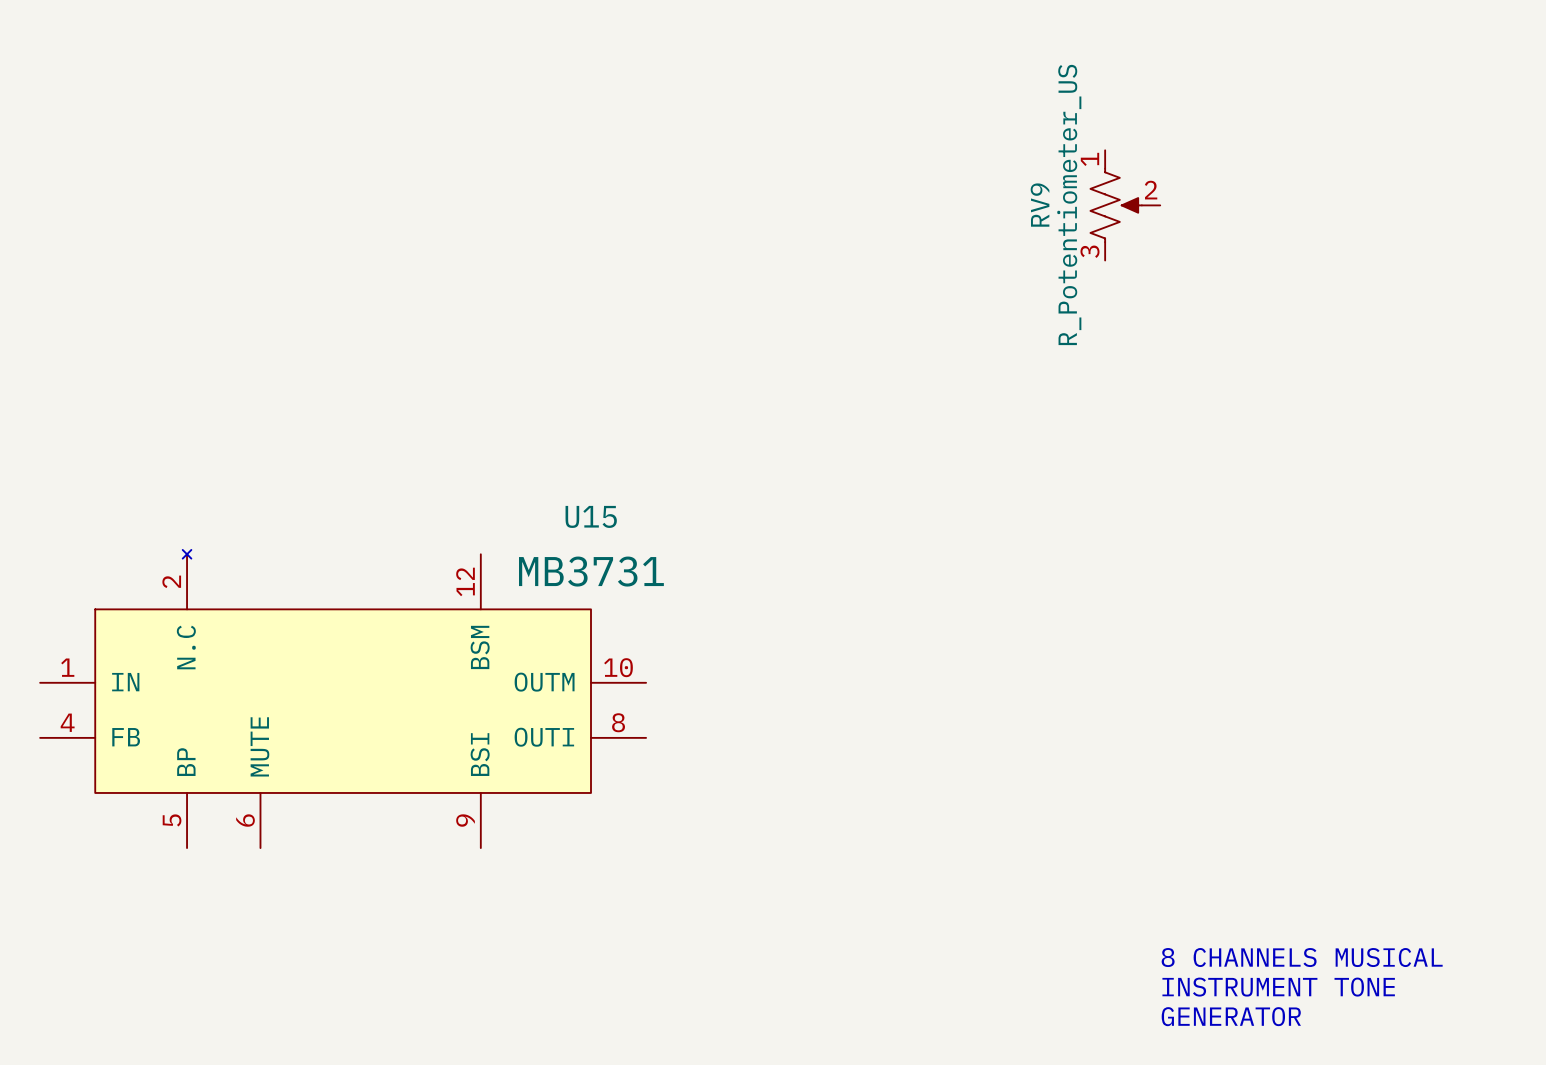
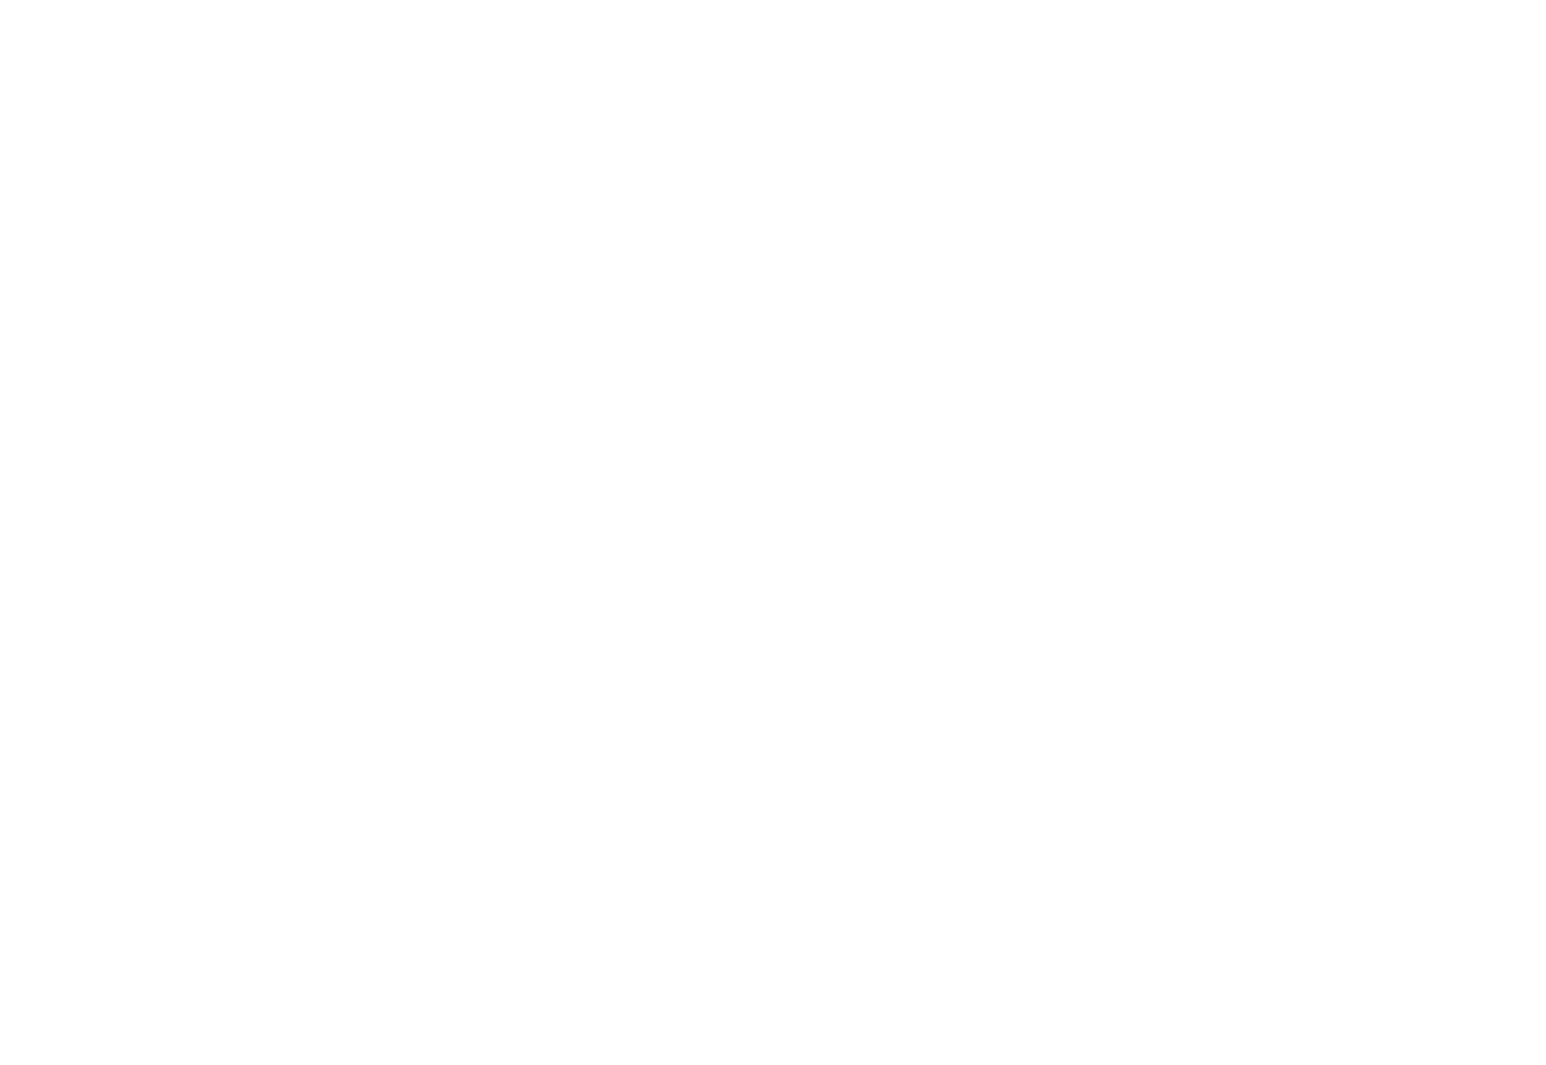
RV9: R_Potentiometer_US (1125, 205) -> none
U15: MB3731 (343, 699) -> none
text: 8 CHANNELS MUSICAL (1302, 957) -> none
text: INSTRUMENT TONE (1278, 987) -> none
text: GENERATOR (1231, 1016) -> none

